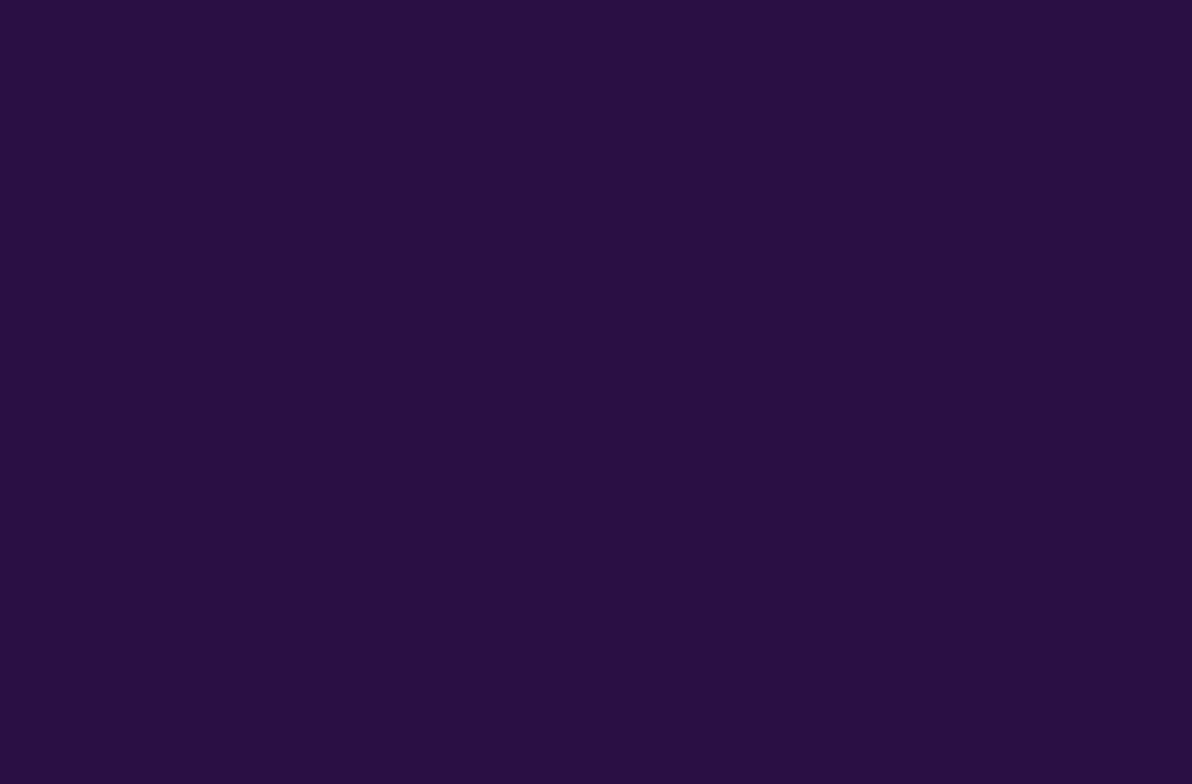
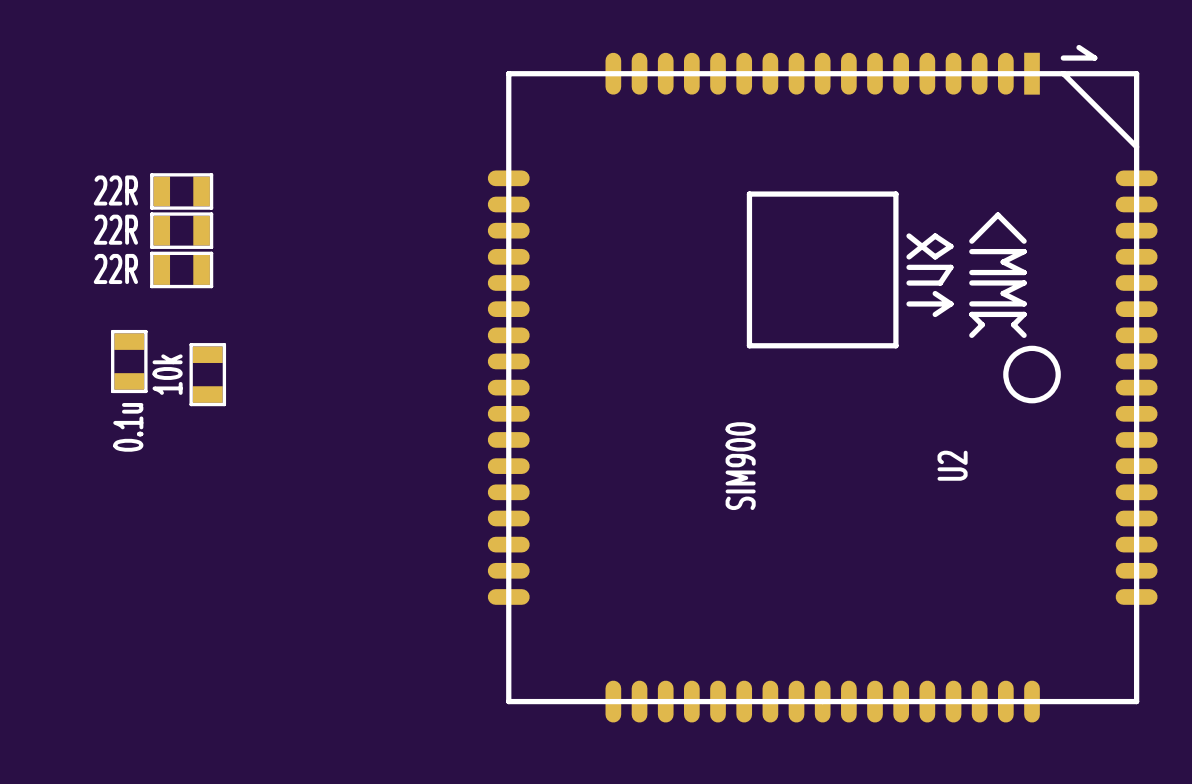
part: none -> 22R (181, 191)
part: none -> 22R (181, 230)
part: none -> 22R (181, 269)
part: none -> 0.1u (129, 361)
part: none -> 10k (207, 374)
U2: none -> SIM900 (822, 383)

